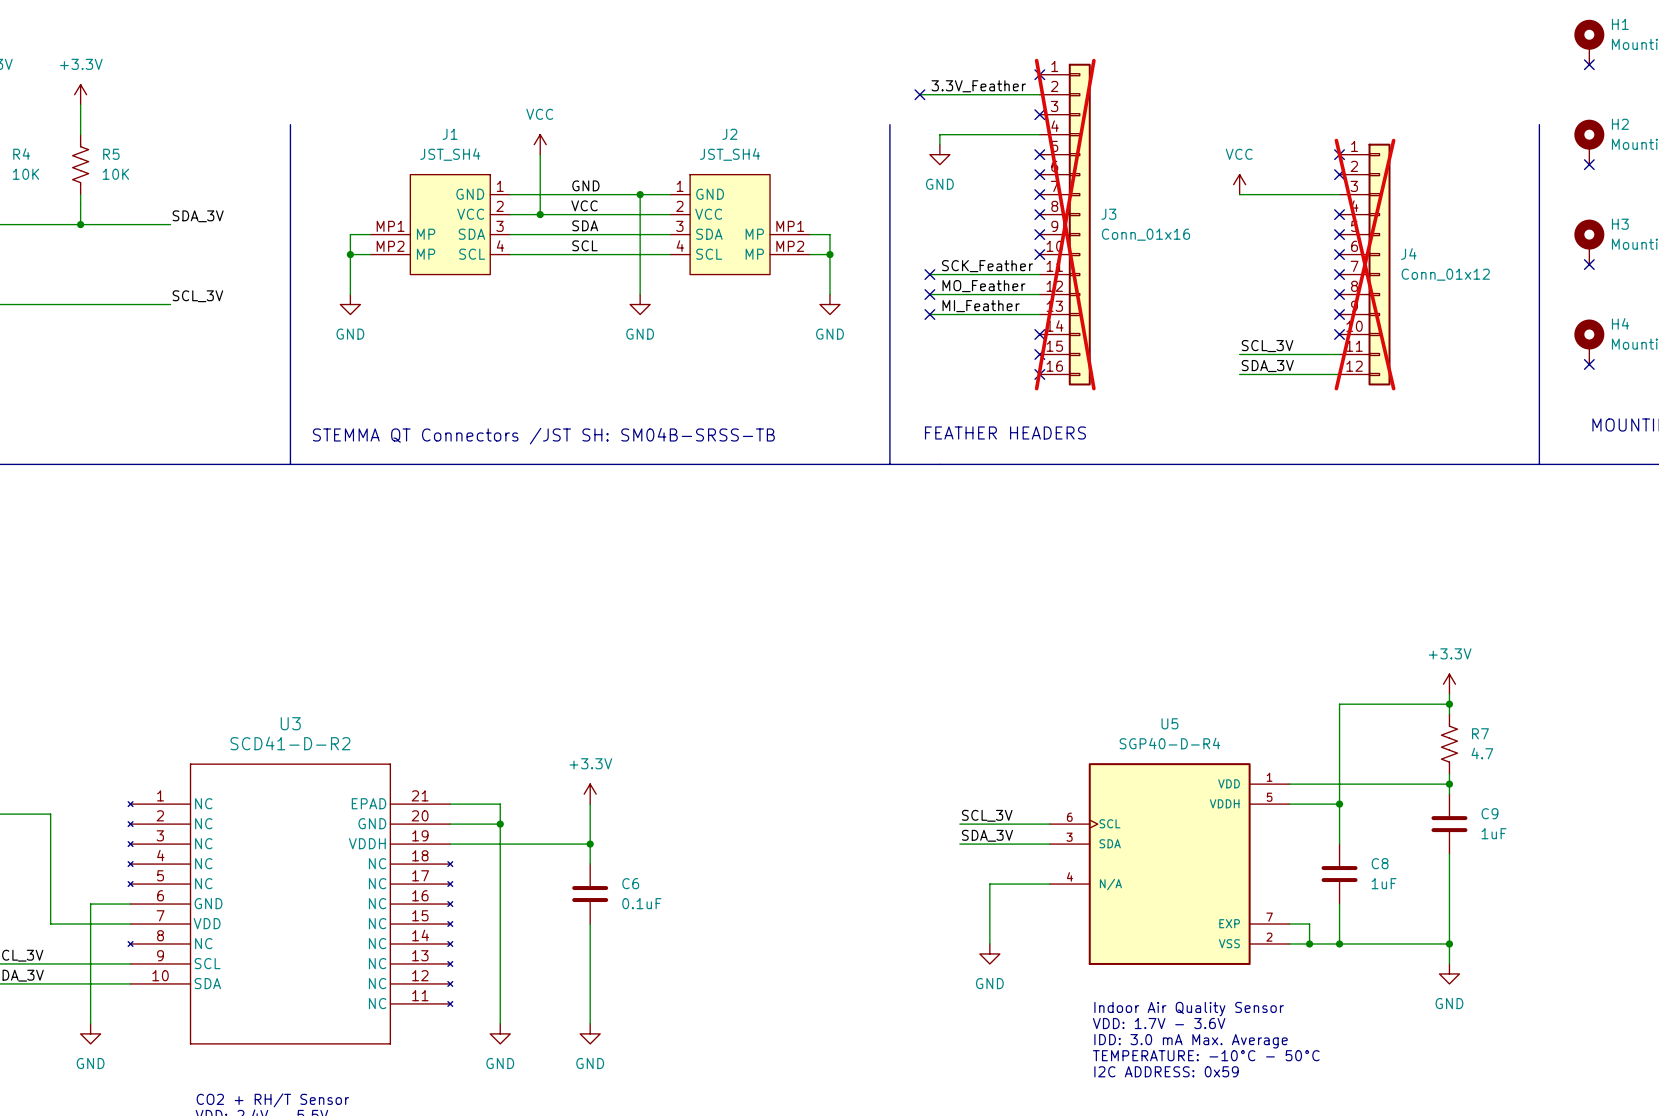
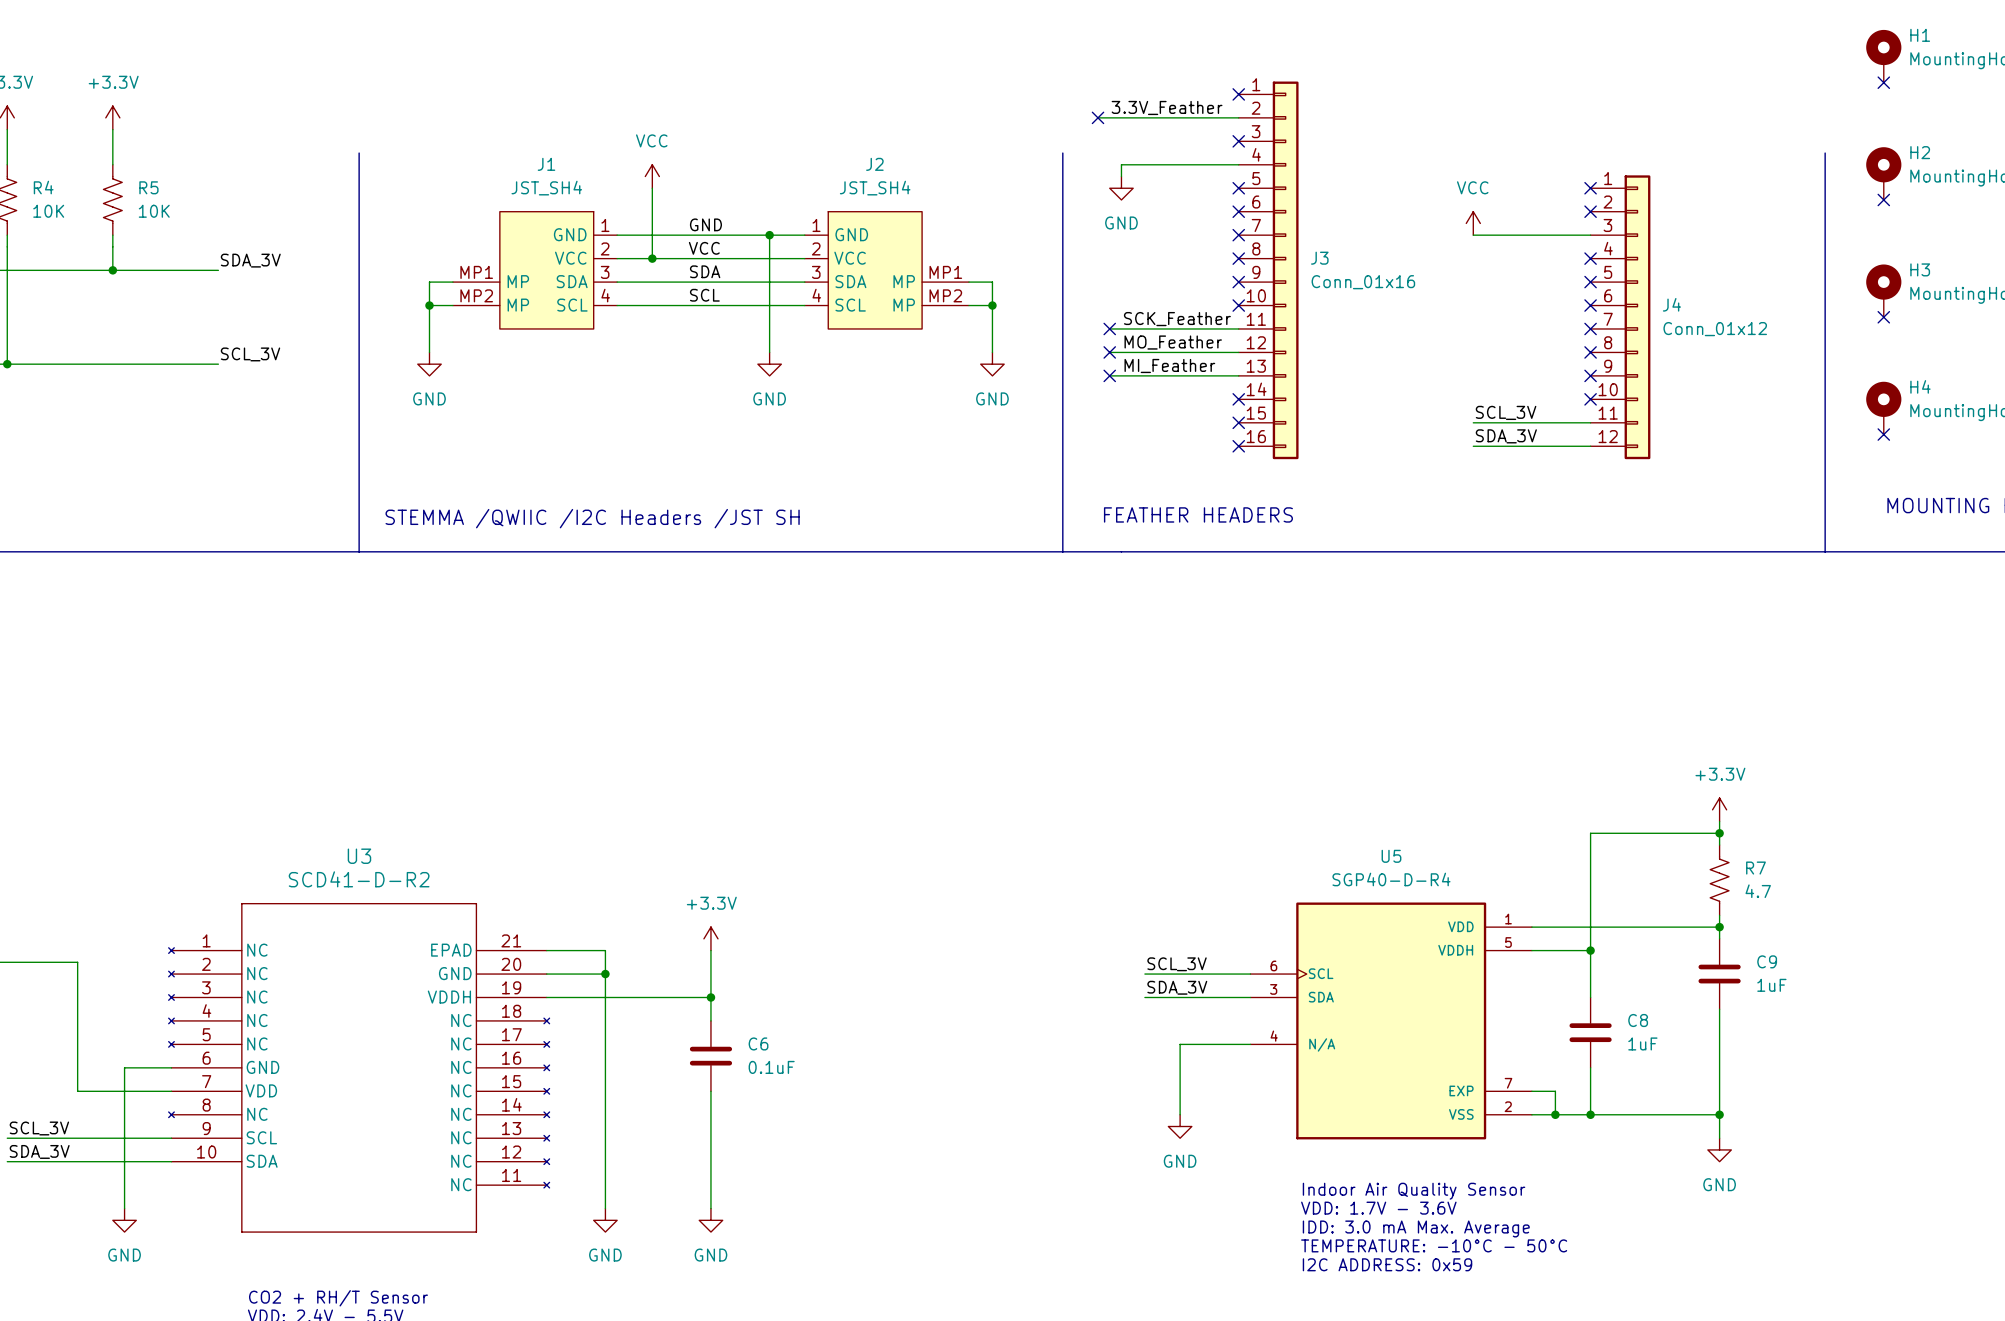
J3 do-not-place cross: (1065, 224) -> none
J4 do-not-place cross: (1365, 264) -> none
text: STEMMA QT Connectors /JST SH: SM04B-SRSS-TB (543, 436) -> STEMMA /QWIIC /I2C Headers /JST SH (592, 518)

